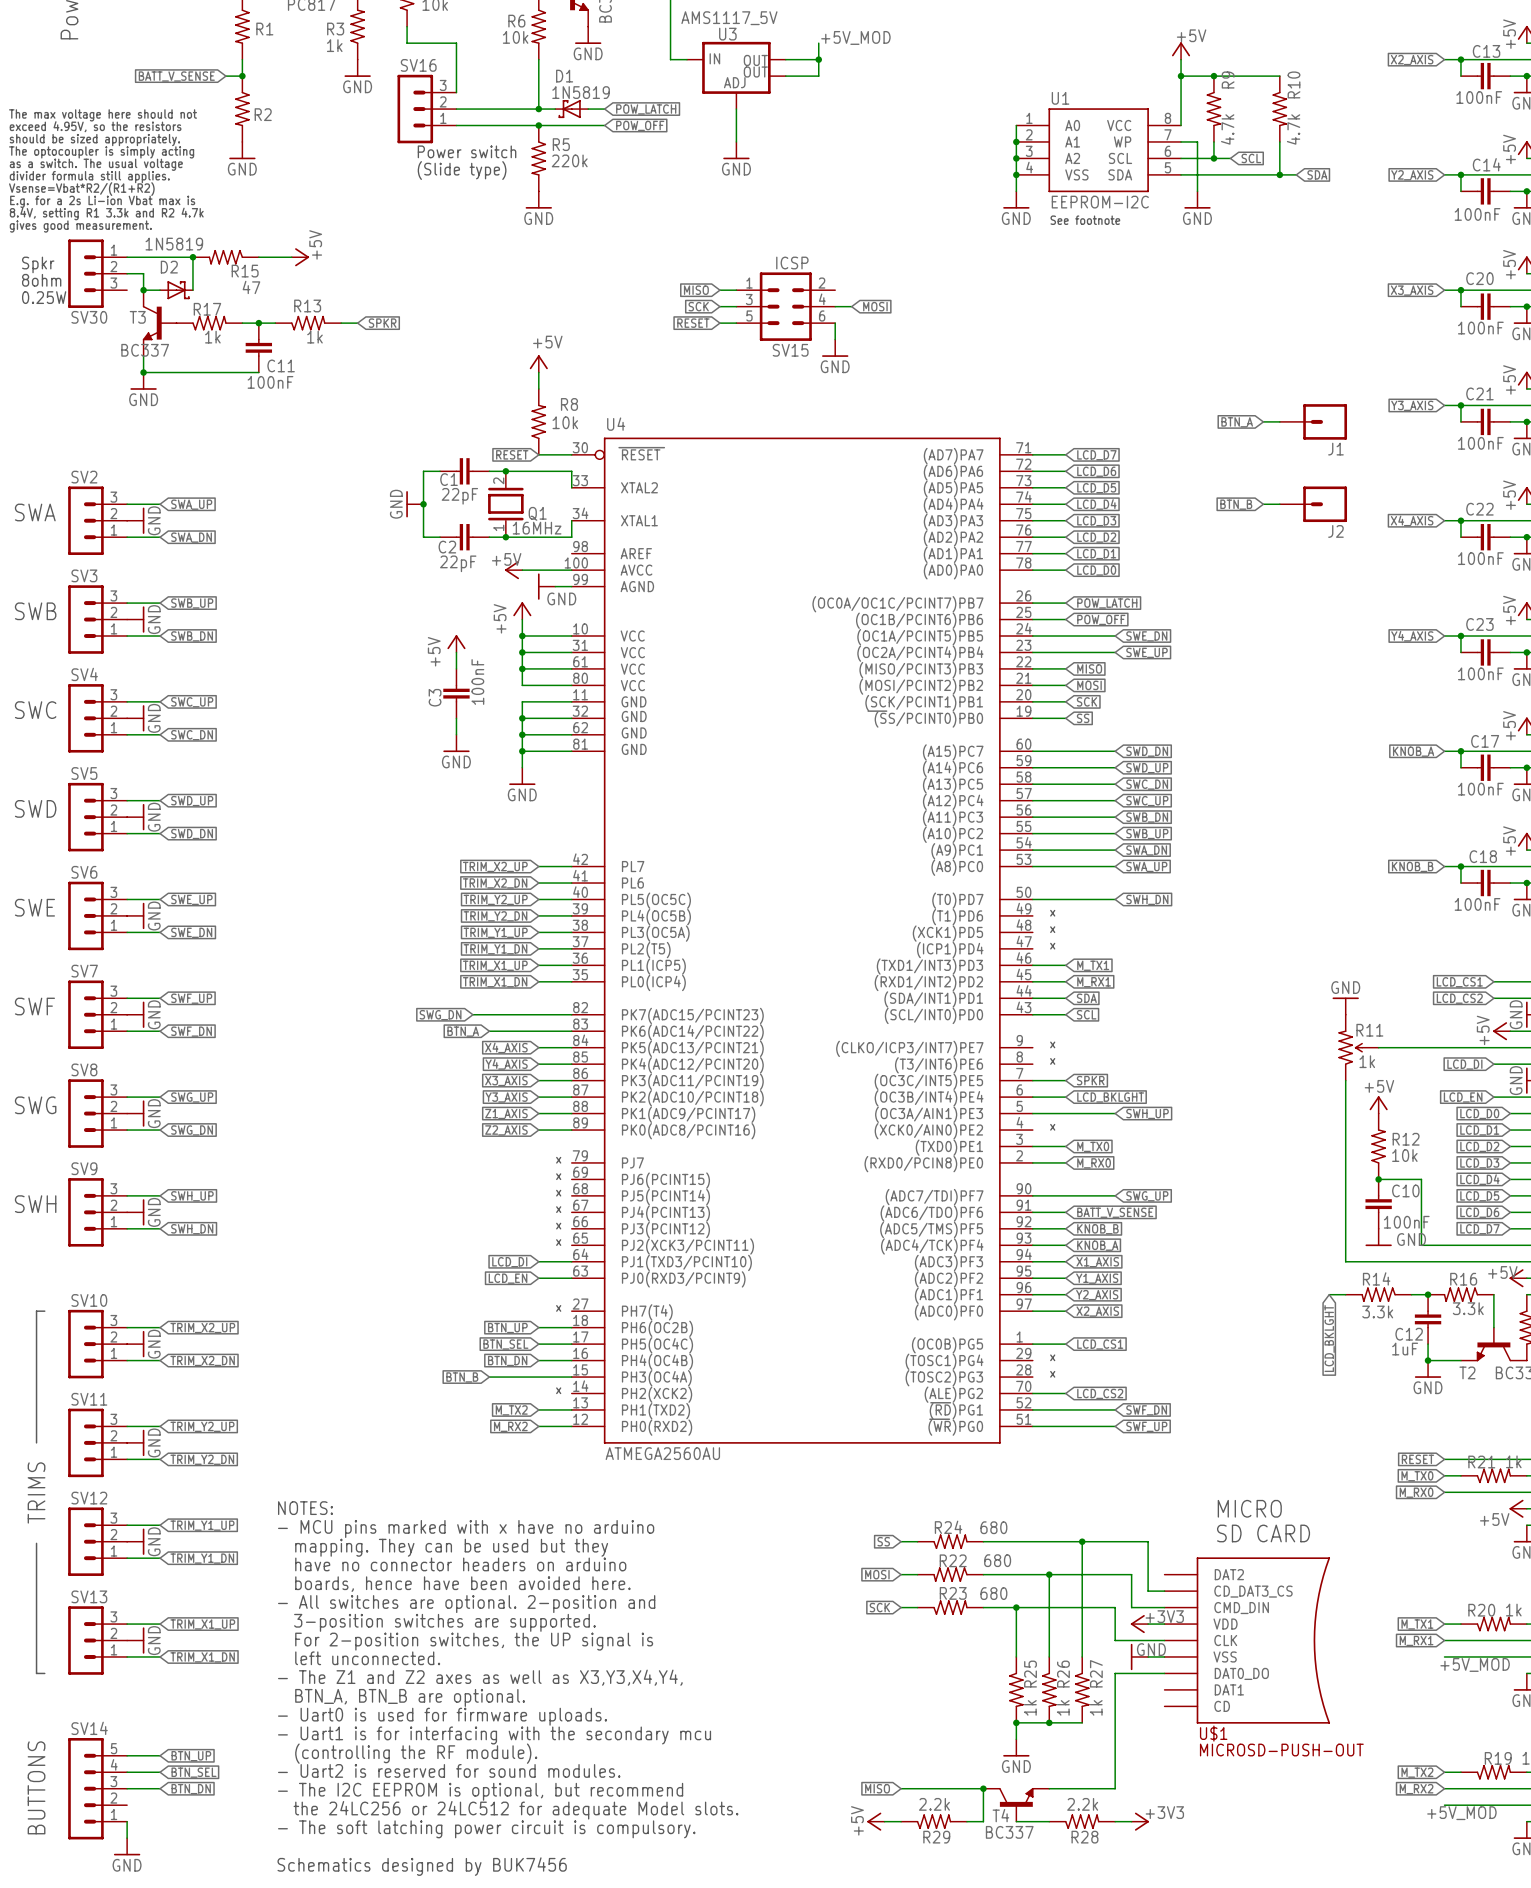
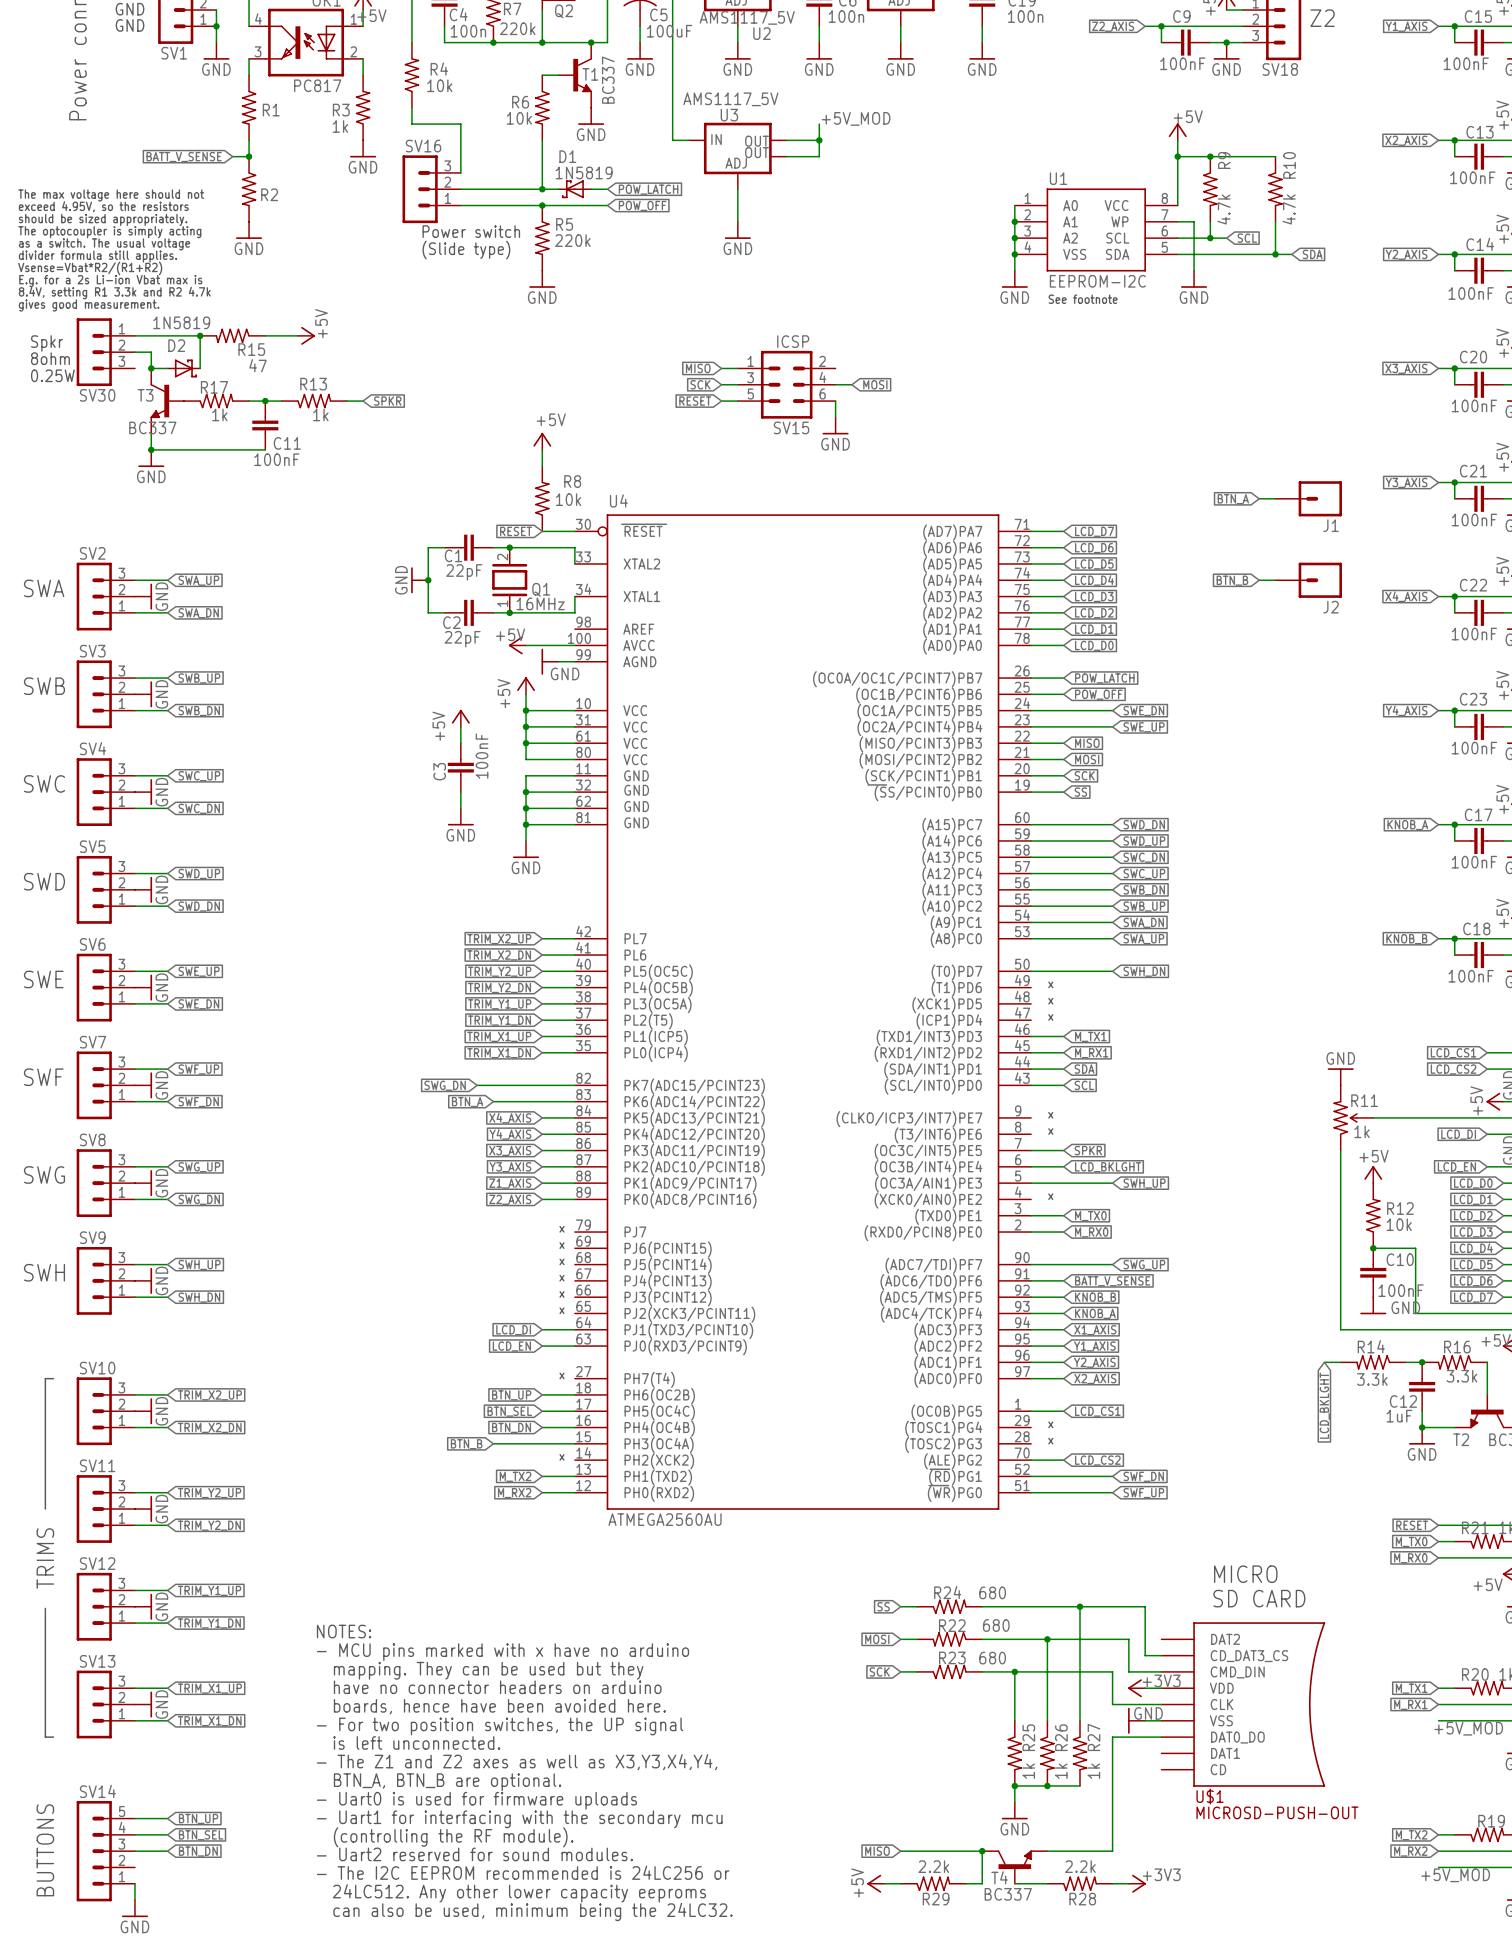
text position: NOTES: (305, 1508) -> NOTES: (344, 1631)
text position: - MCU pins marked with x have no arduino (466, 1528) -> - MCU pins marked with x have no arduino (502, 1652)
text position: mapping. They can be used but they (451, 1547) -> mapping. They can be used but they (488, 1670)
text position: have no connector headers on arduino (460, 1564) -> have no connector headers on arduino (497, 1687)
text position: boards, hence have been avoided here. (462, 1584) -> boards, hence have been avoided here. (499, 1706)
text: - All switches are optional. 2-position and (466, 1604) -> none
text: 3-position switches are supported. (444, 1622) -> none
text: For 2-position switches, the UP signal is (474, 1641) -> - For two position switches, the UP signal (500, 1726)
text: left unconnected. (367, 1658) -> is left unconnected. (416, 1742)
text position: - The Z1 and Z2 axes as well as X3,Y3,X4,Y4, (480, 1677) -> - The Z1 and Z2 axes as well as X3,Y3,X4,Y4, (517, 1762)
text position: BTN_A, BTN_B are optional. (410, 1697) -> BTN_A, BTN_B are optional. (447, 1782)
text: - Uart0 is used for firmware uploads. (442, 1716) -> - Uart0 is used for firmware uploads (476, 1800)
text: - Uart1 is for interfacing with the secondary mcu (494, 1735) -> - Uart1 for interfacing with the secondary mcu (519, 1819)
text position: (controlling the RF module). (416, 1753) -> (controlling the RF module). (453, 1837)
text: - Uart2 is reserved for sound modules. (449, 1770) -> - Uart2 reserved for sound modules. (474, 1854)
text: - The I2C EEPROM is optional, but recommend (480, 1791) -> - The I2C EEPROM recommended is 24LC256 or (523, 1872)
text: the 24LC256 or 24LC512 for adequate Model slots. (516, 1810) -> none
text: - The soft latching power circuit is compulsory. (486, 1829) -> none
text: none -> 24LC512. Any other lower capacity eeproms (519, 1893)
text: none -> can also be used, minimum being the 24LC32. (532, 1911)
text: Schematics designed by BUK7456 (422, 1866) -> none

